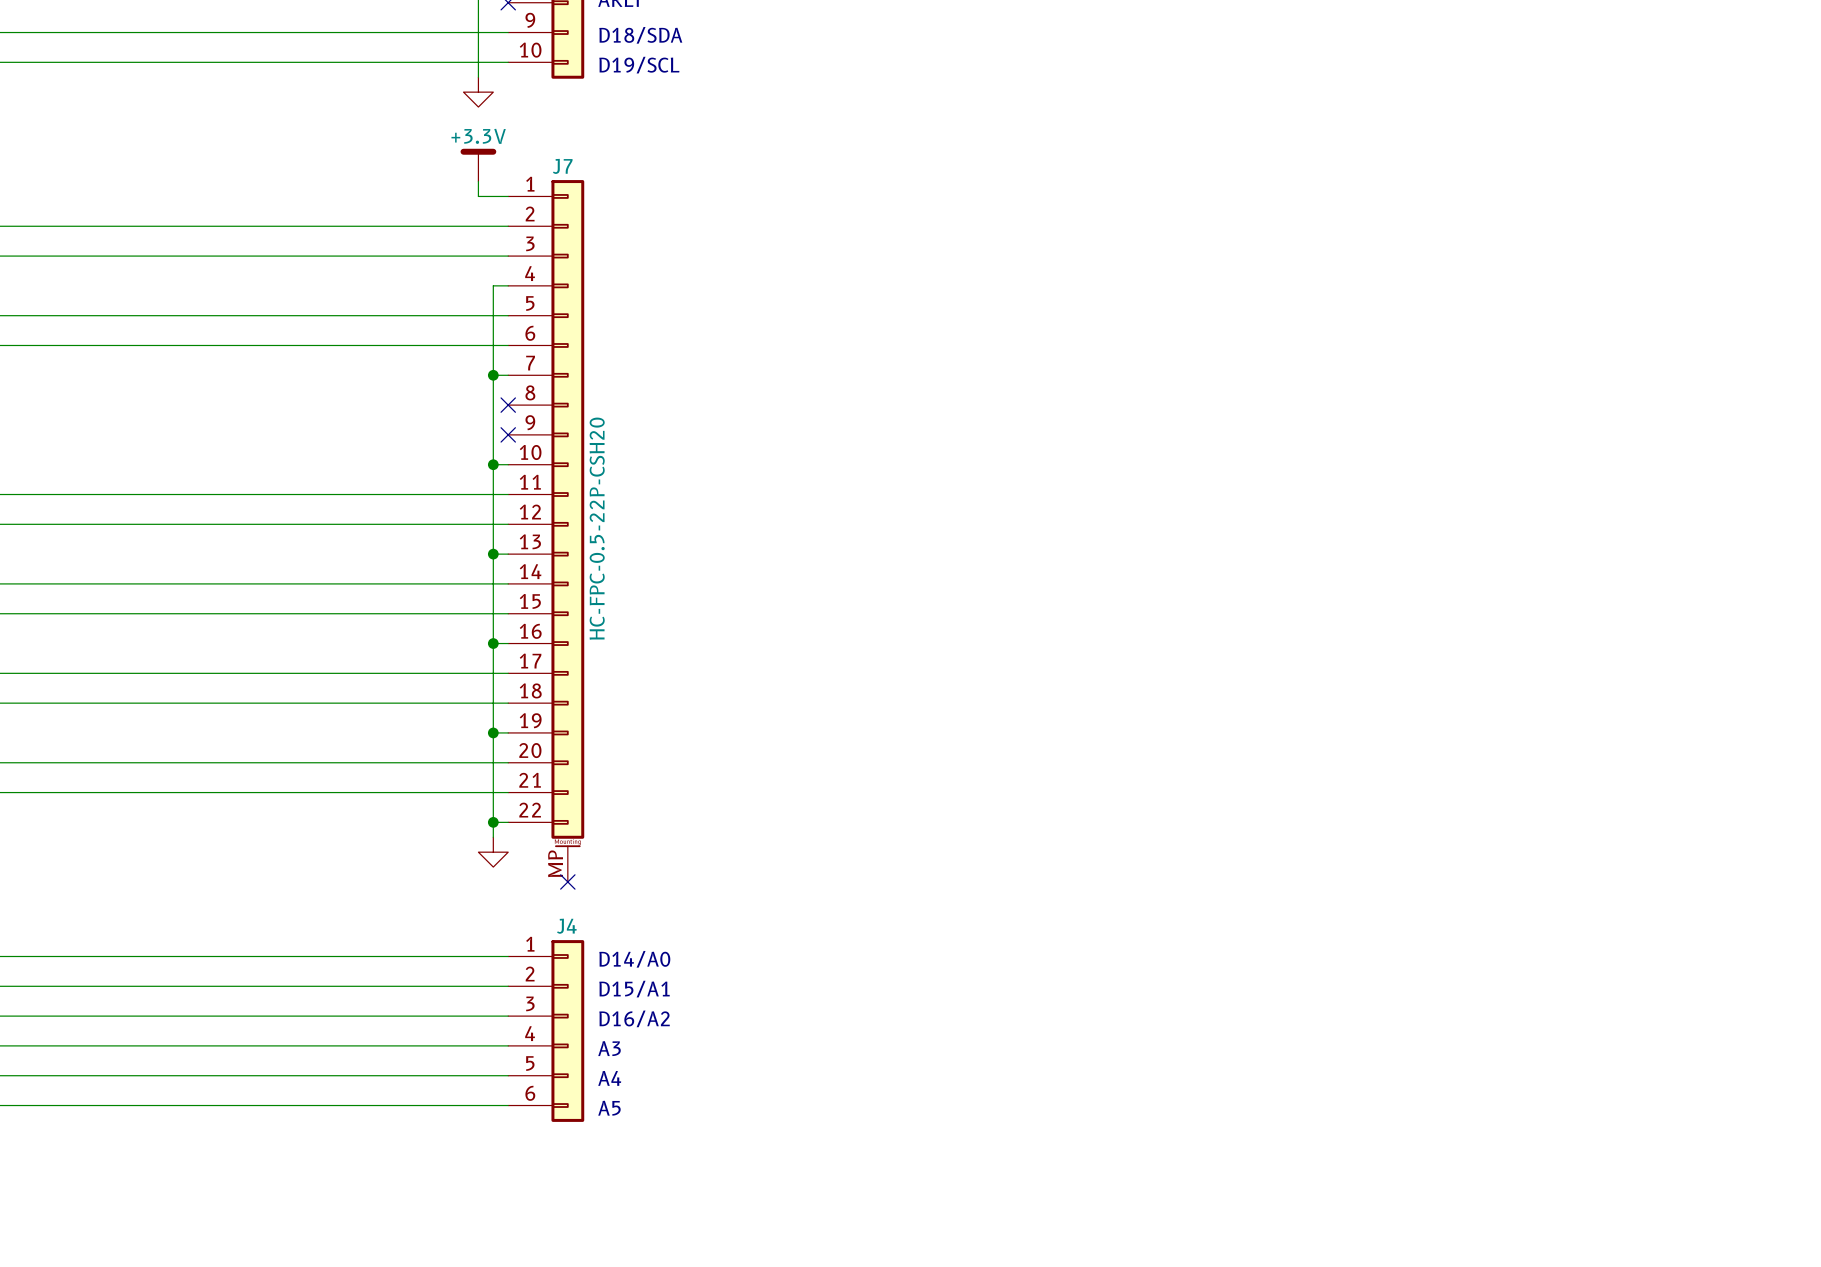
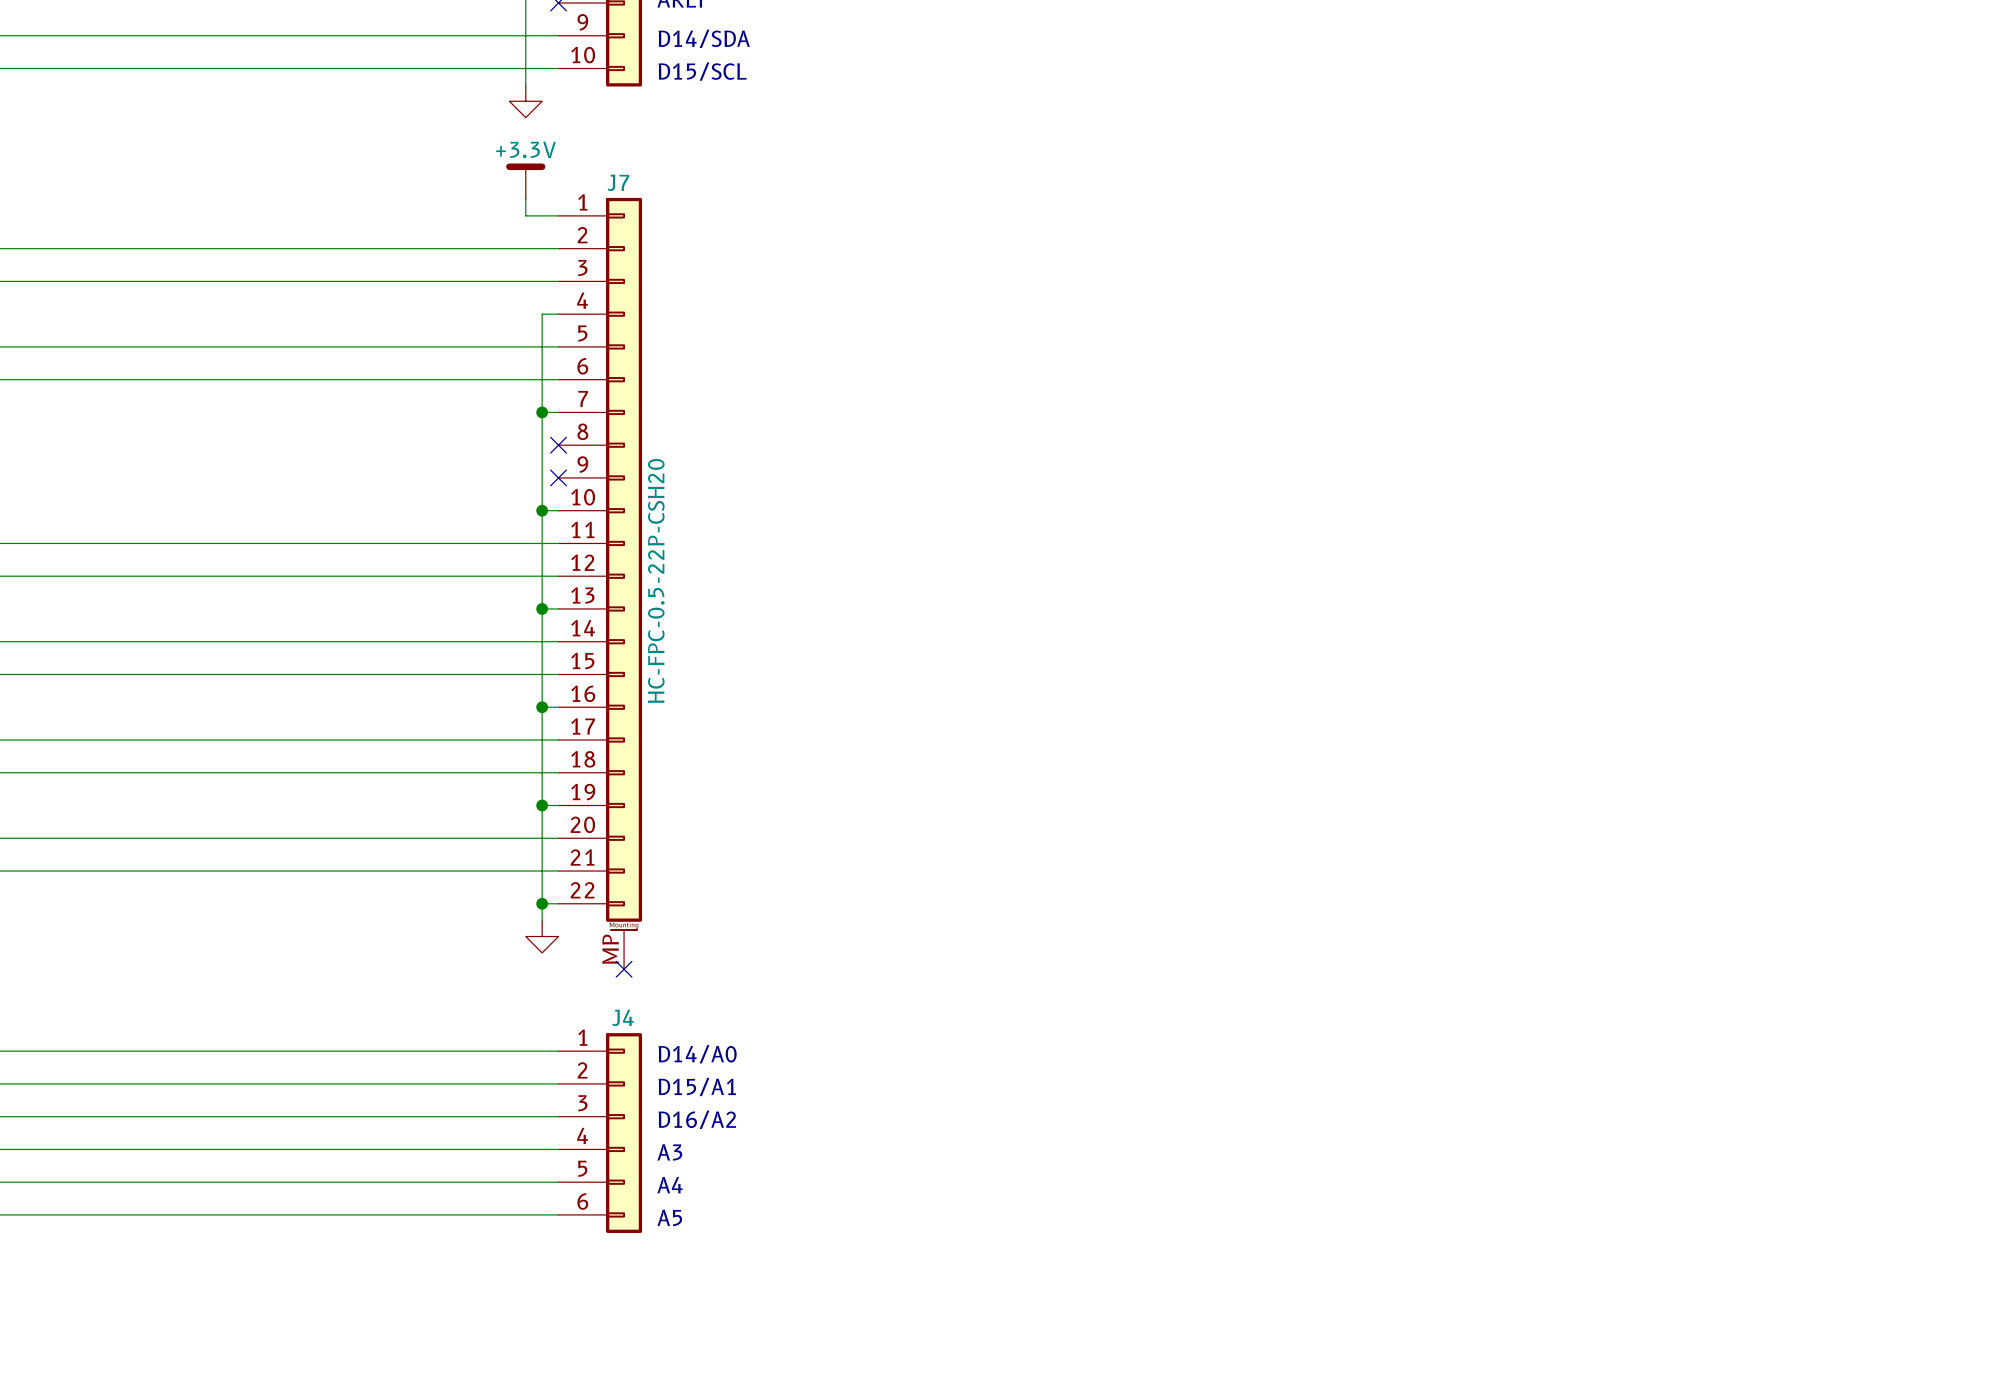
text: D18/SDA (640, 35) -> D14/SDA (704, 38)
text: D19/SCL (639, 65) -> D15/SCL (702, 71)

